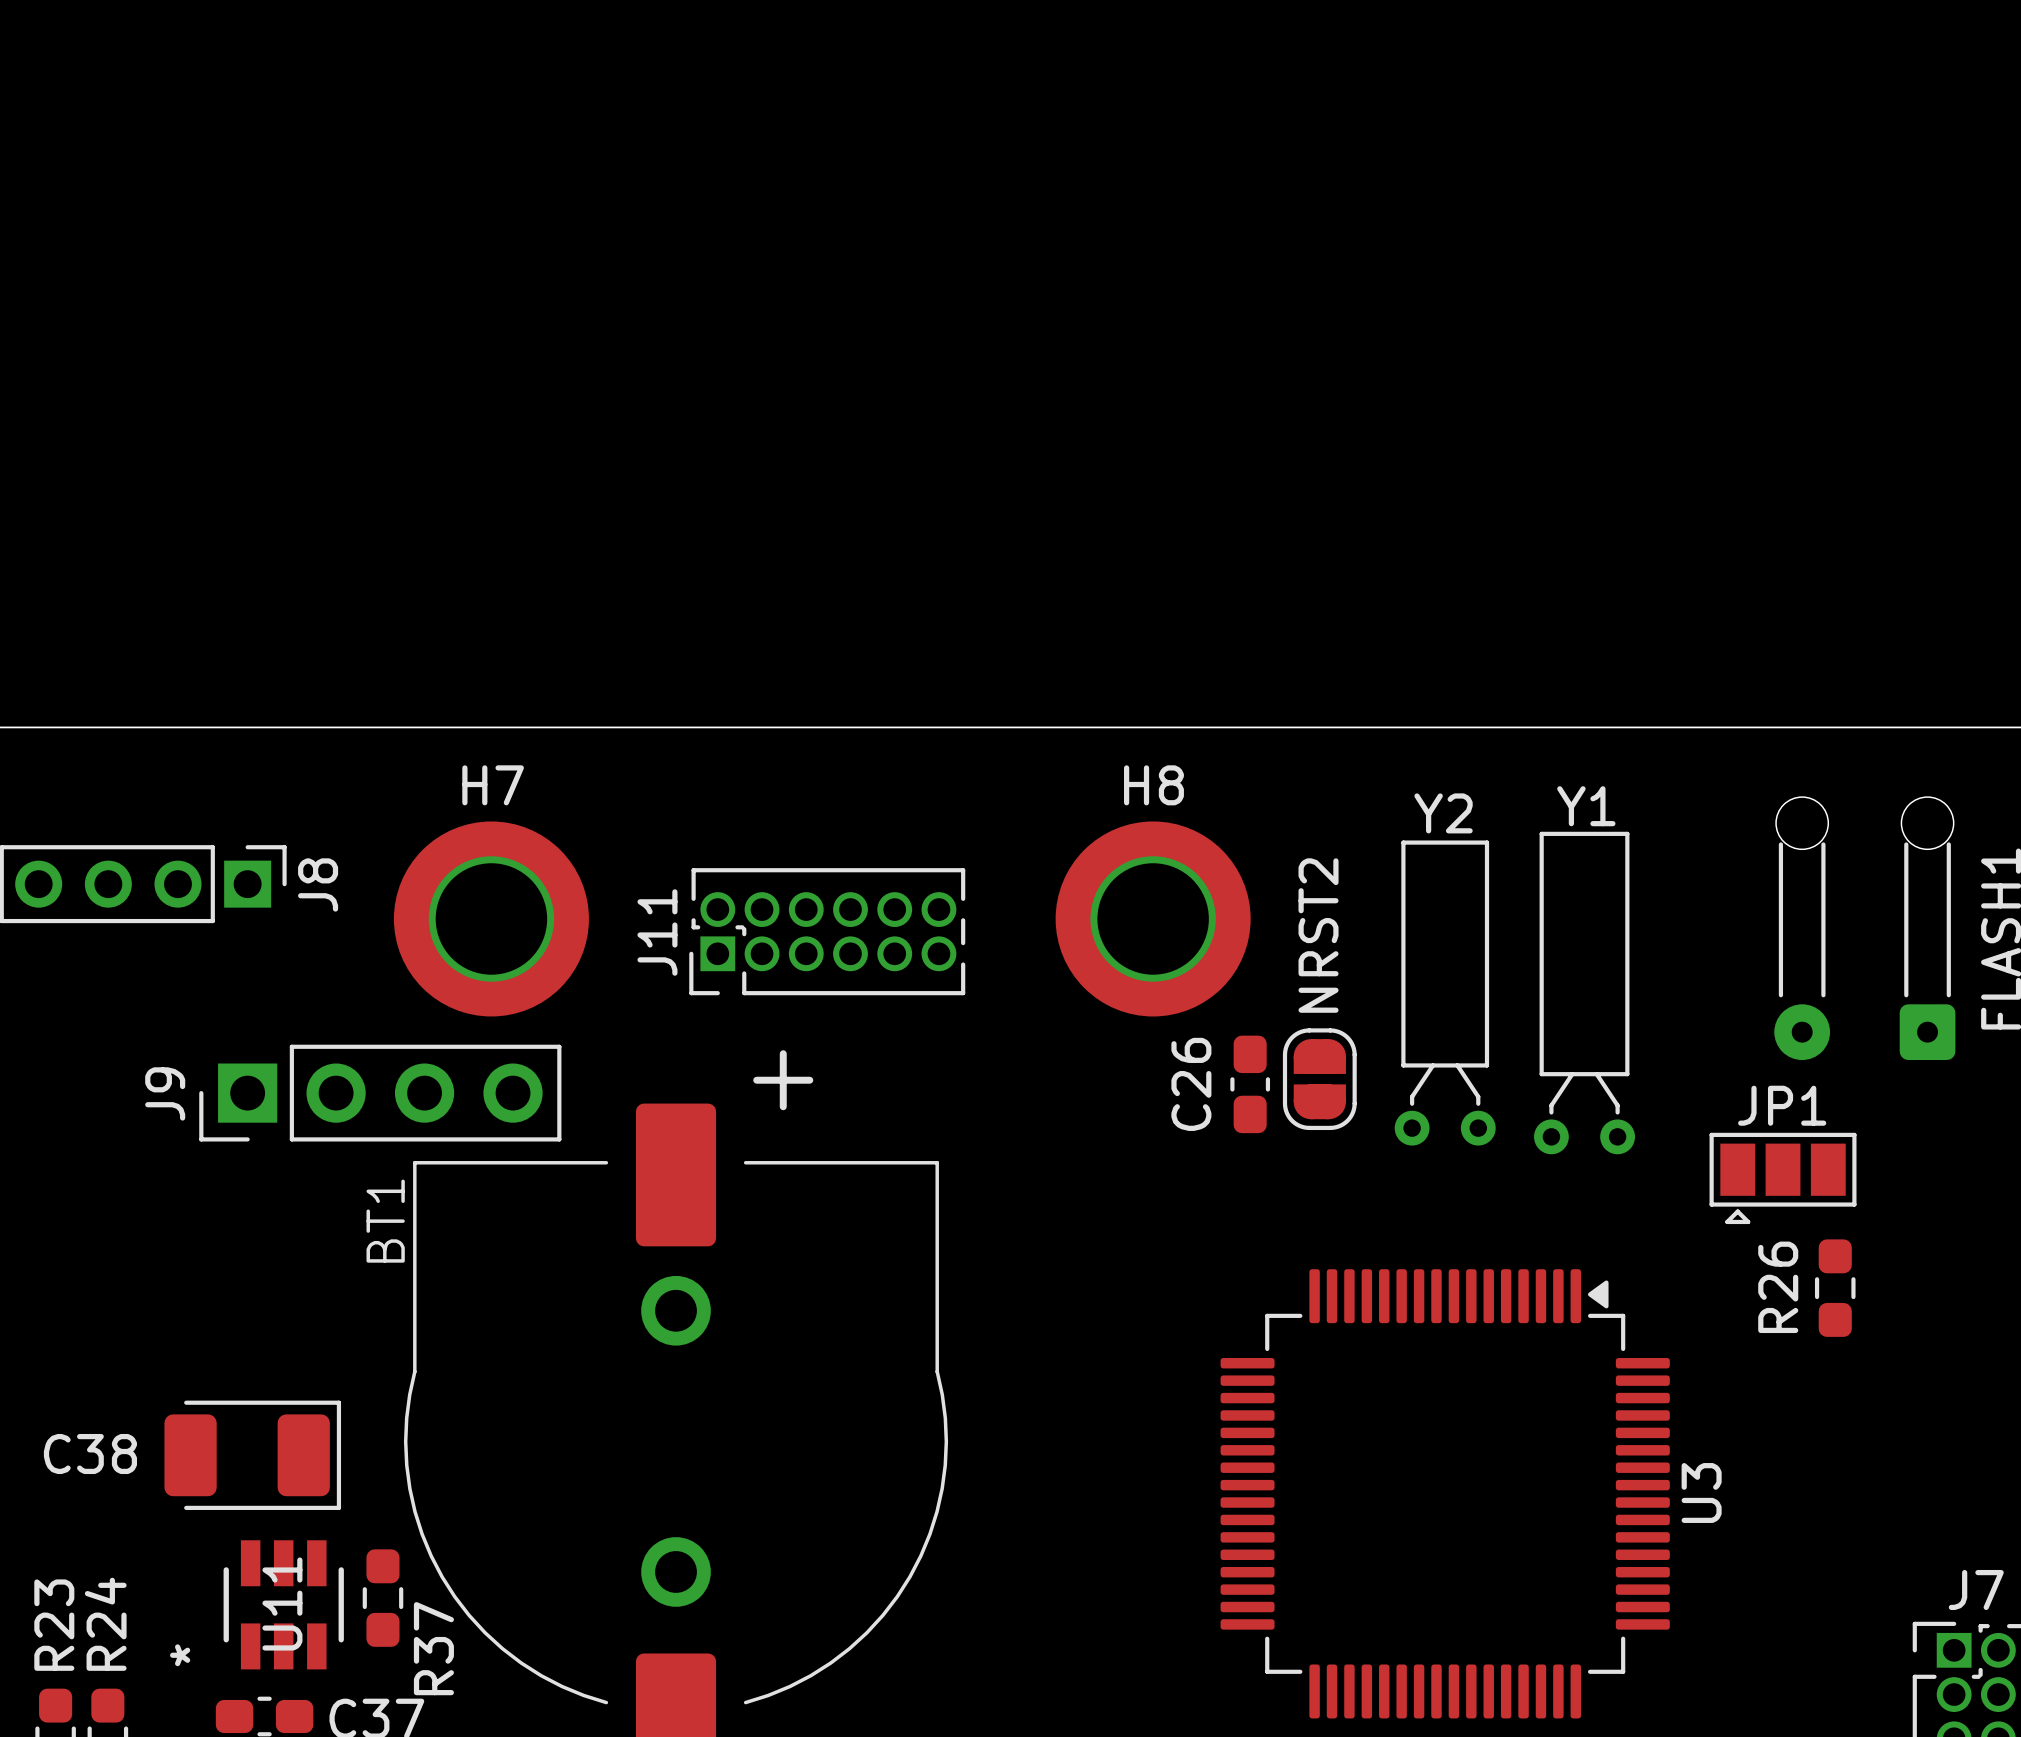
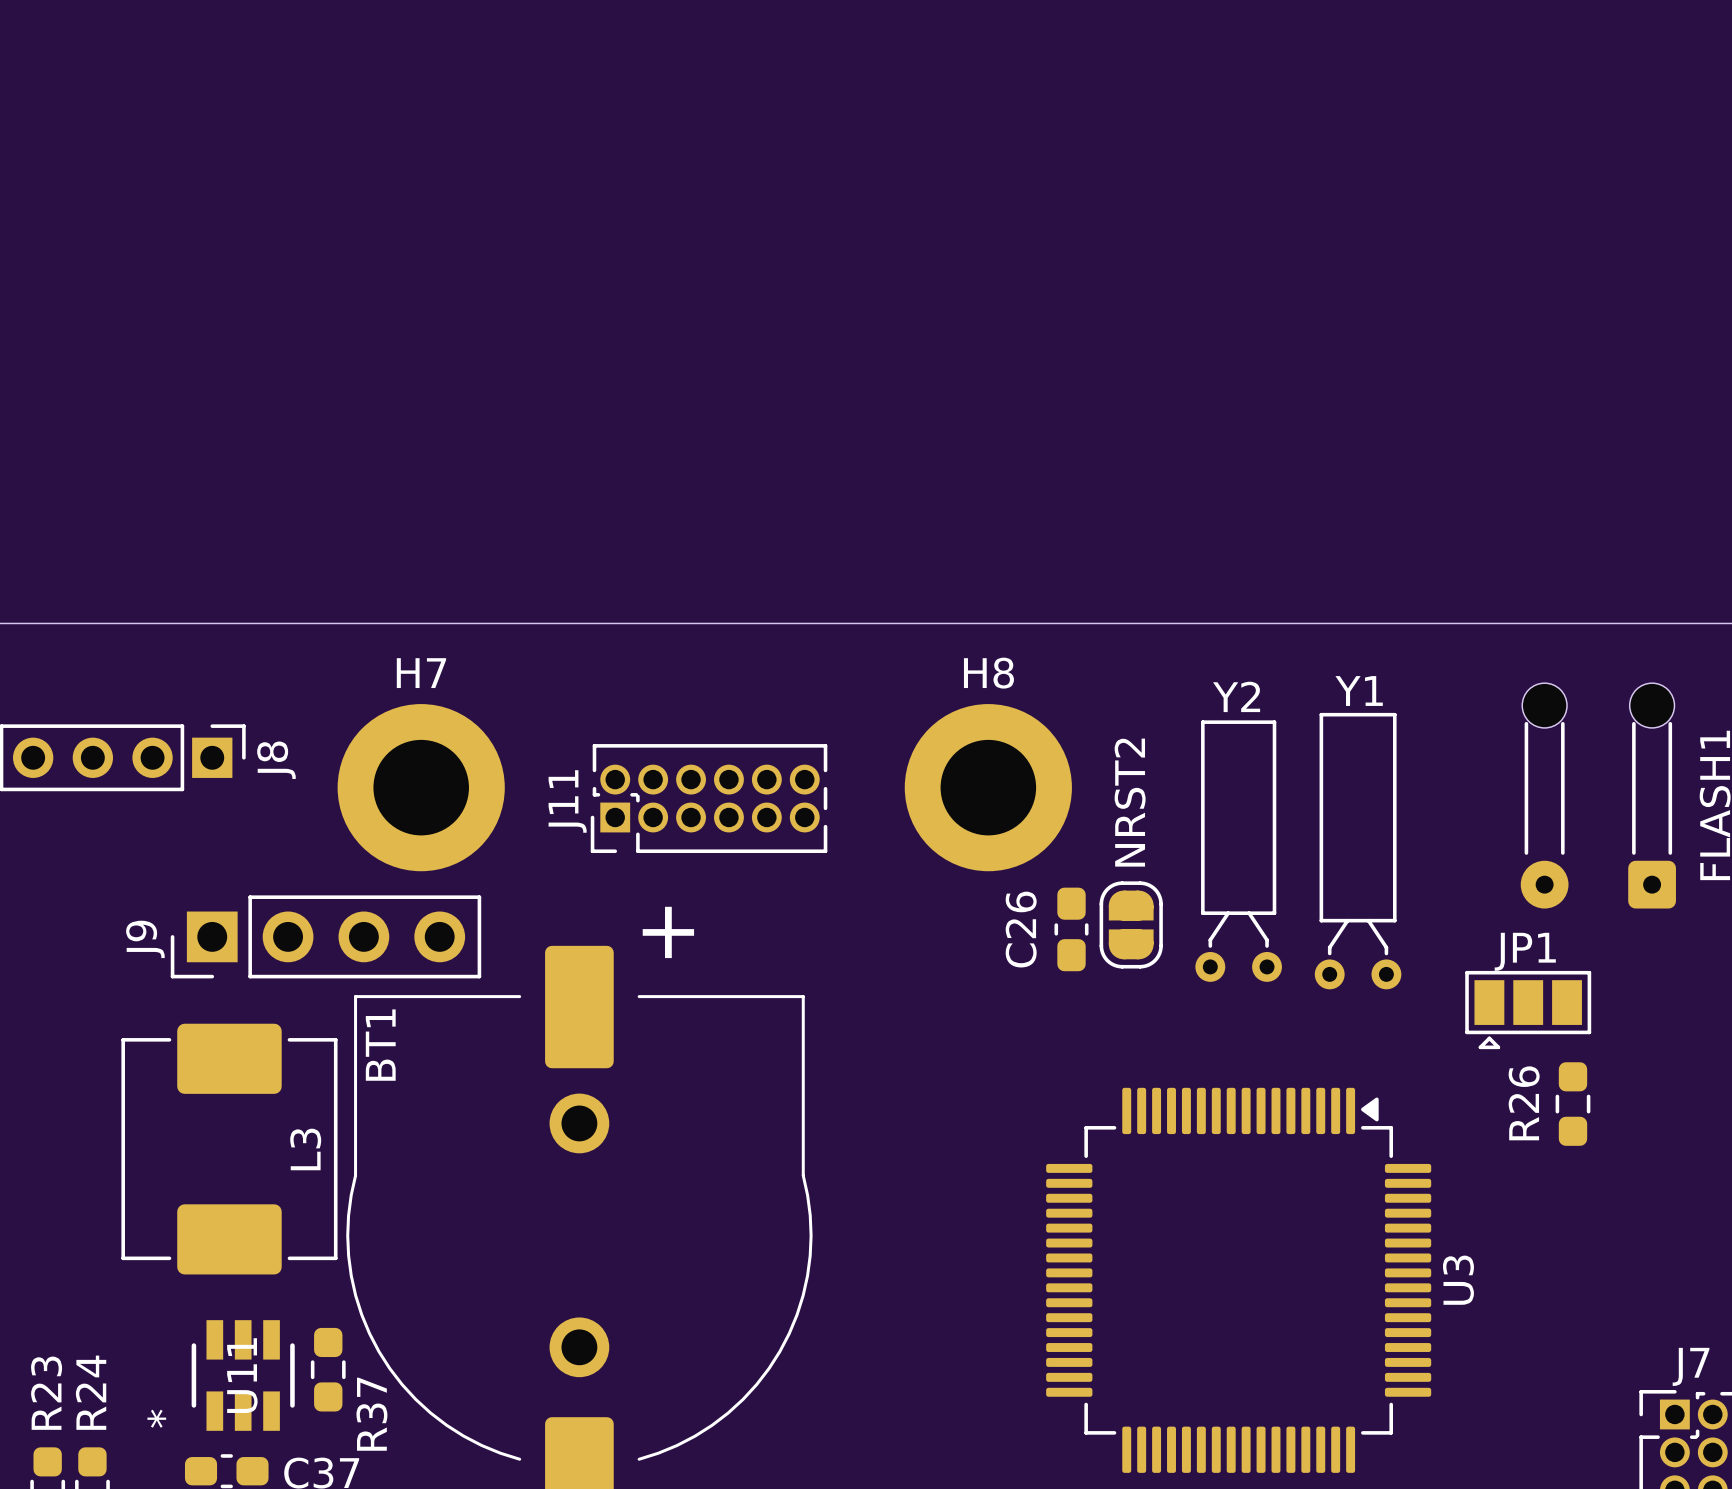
BT1 name position: BT1 (385, 1221) -> BT1 (380, 1045)
L3: none -> (229, 1149)
C38: (252, 1455) -> none

